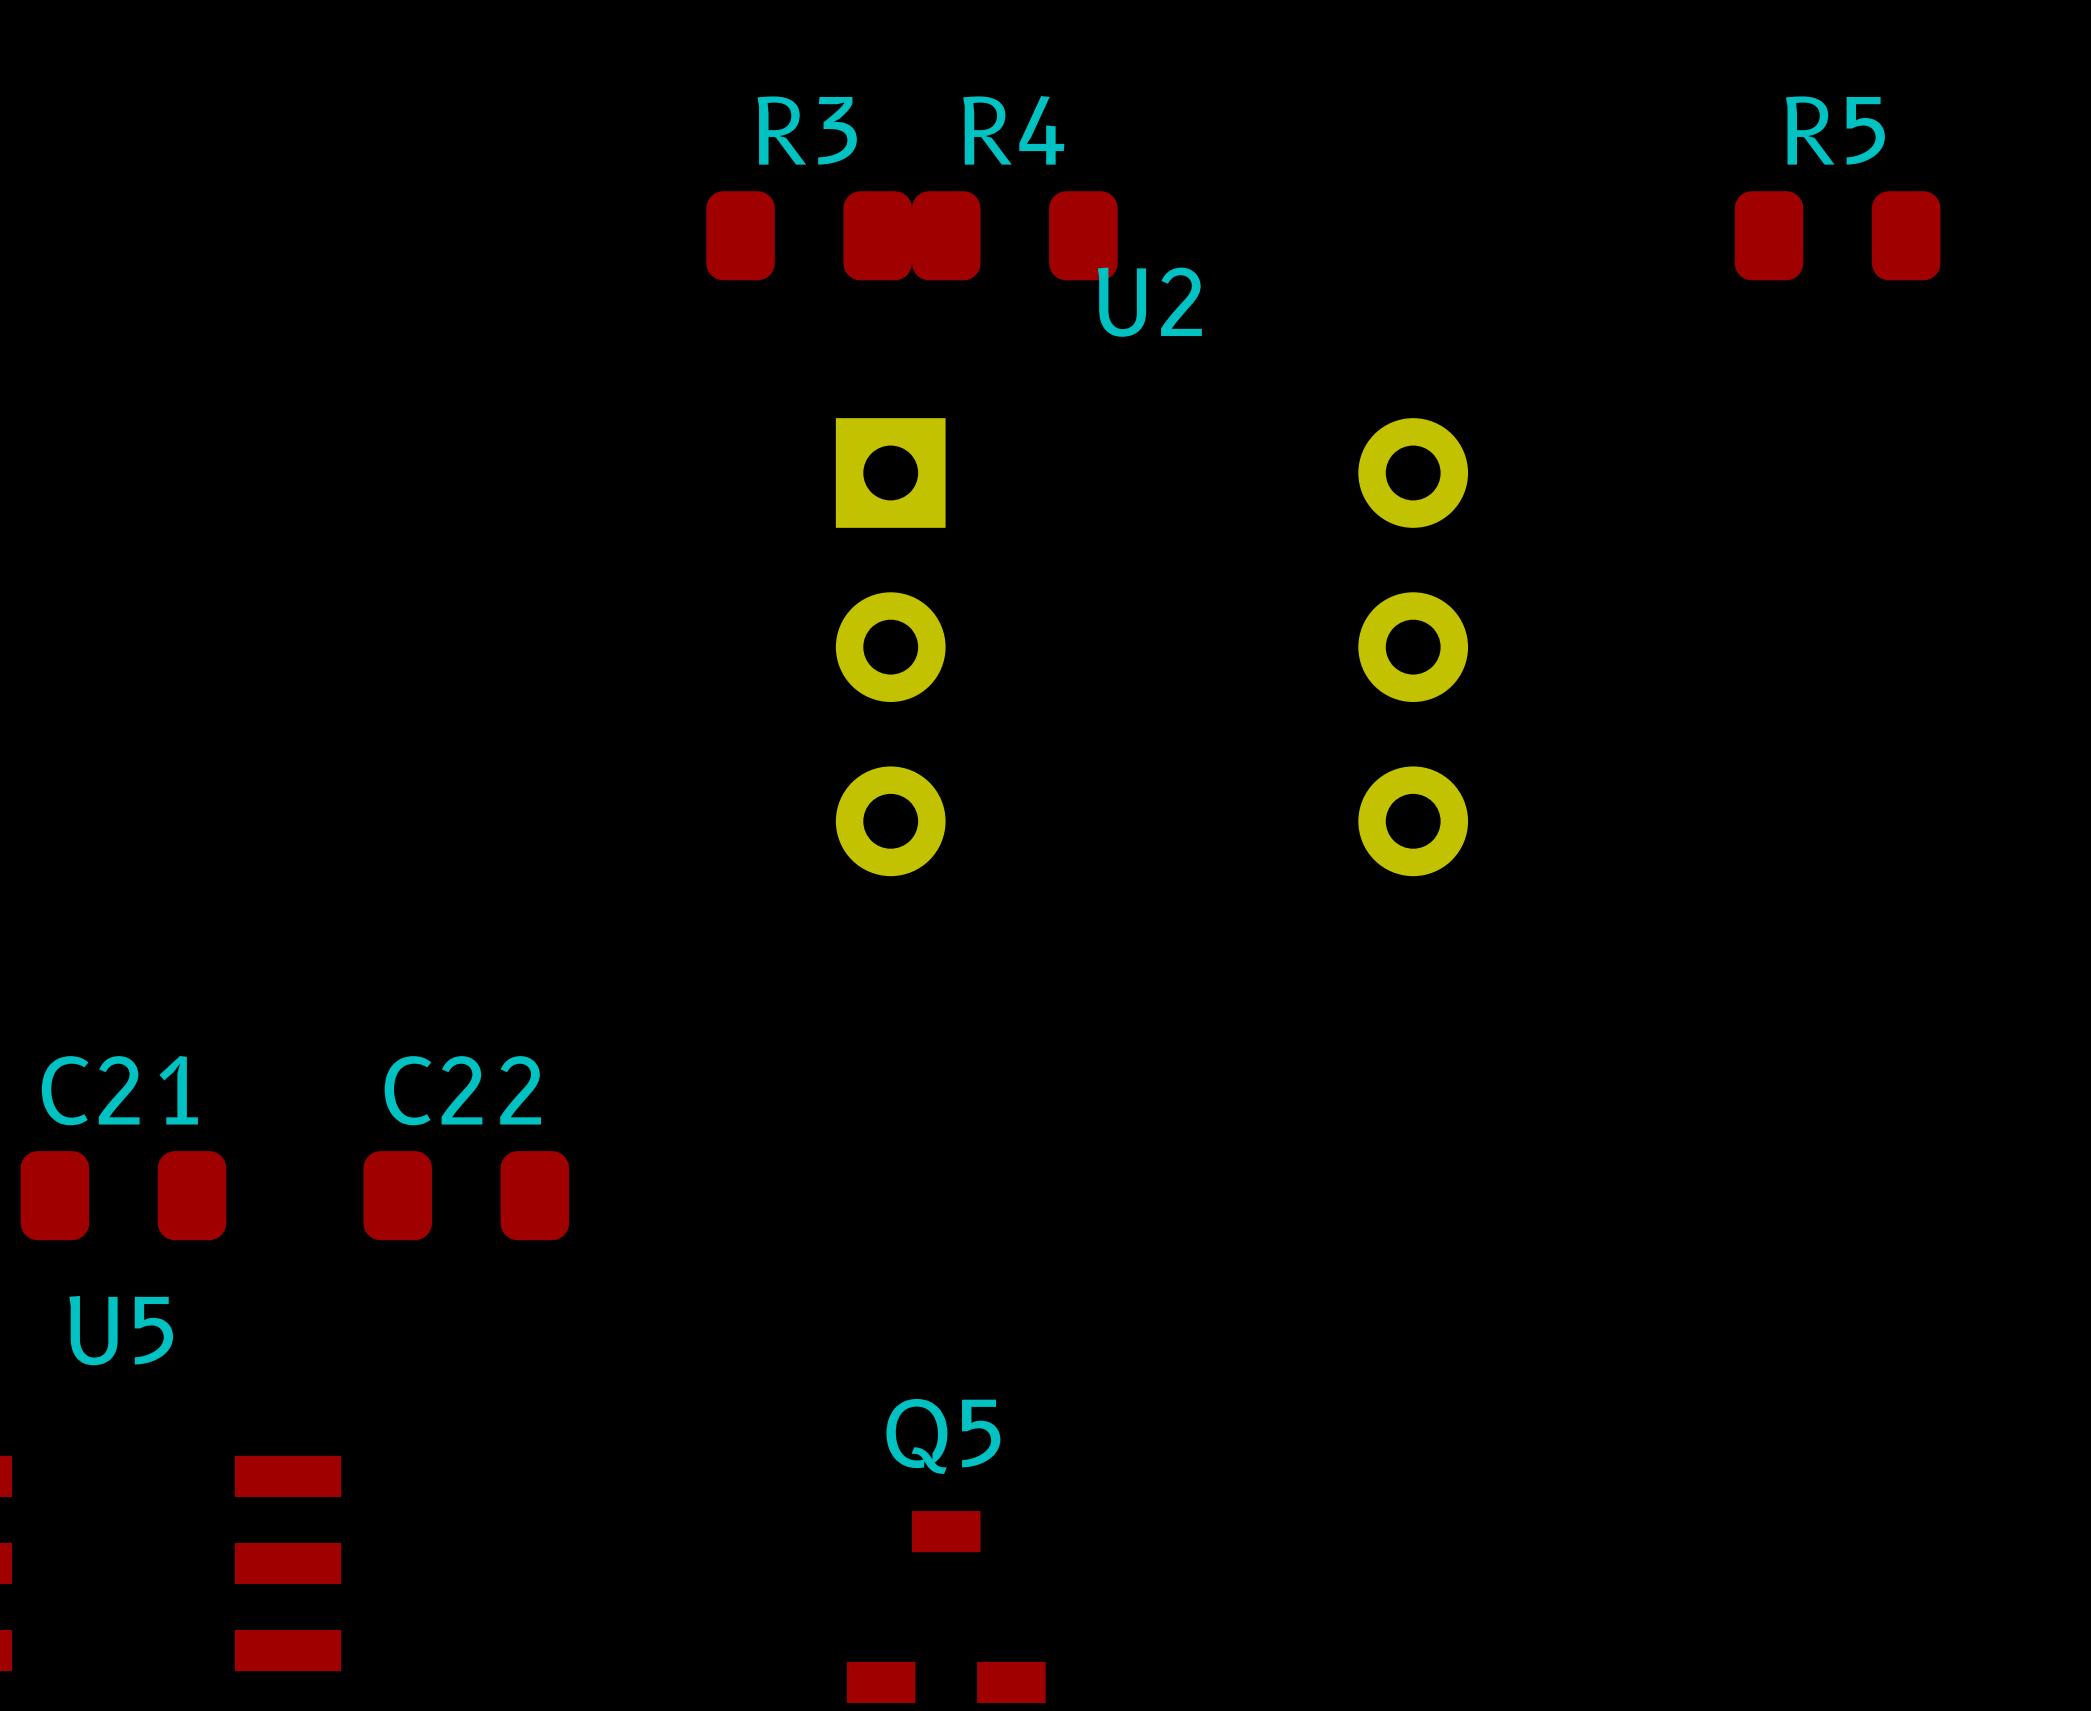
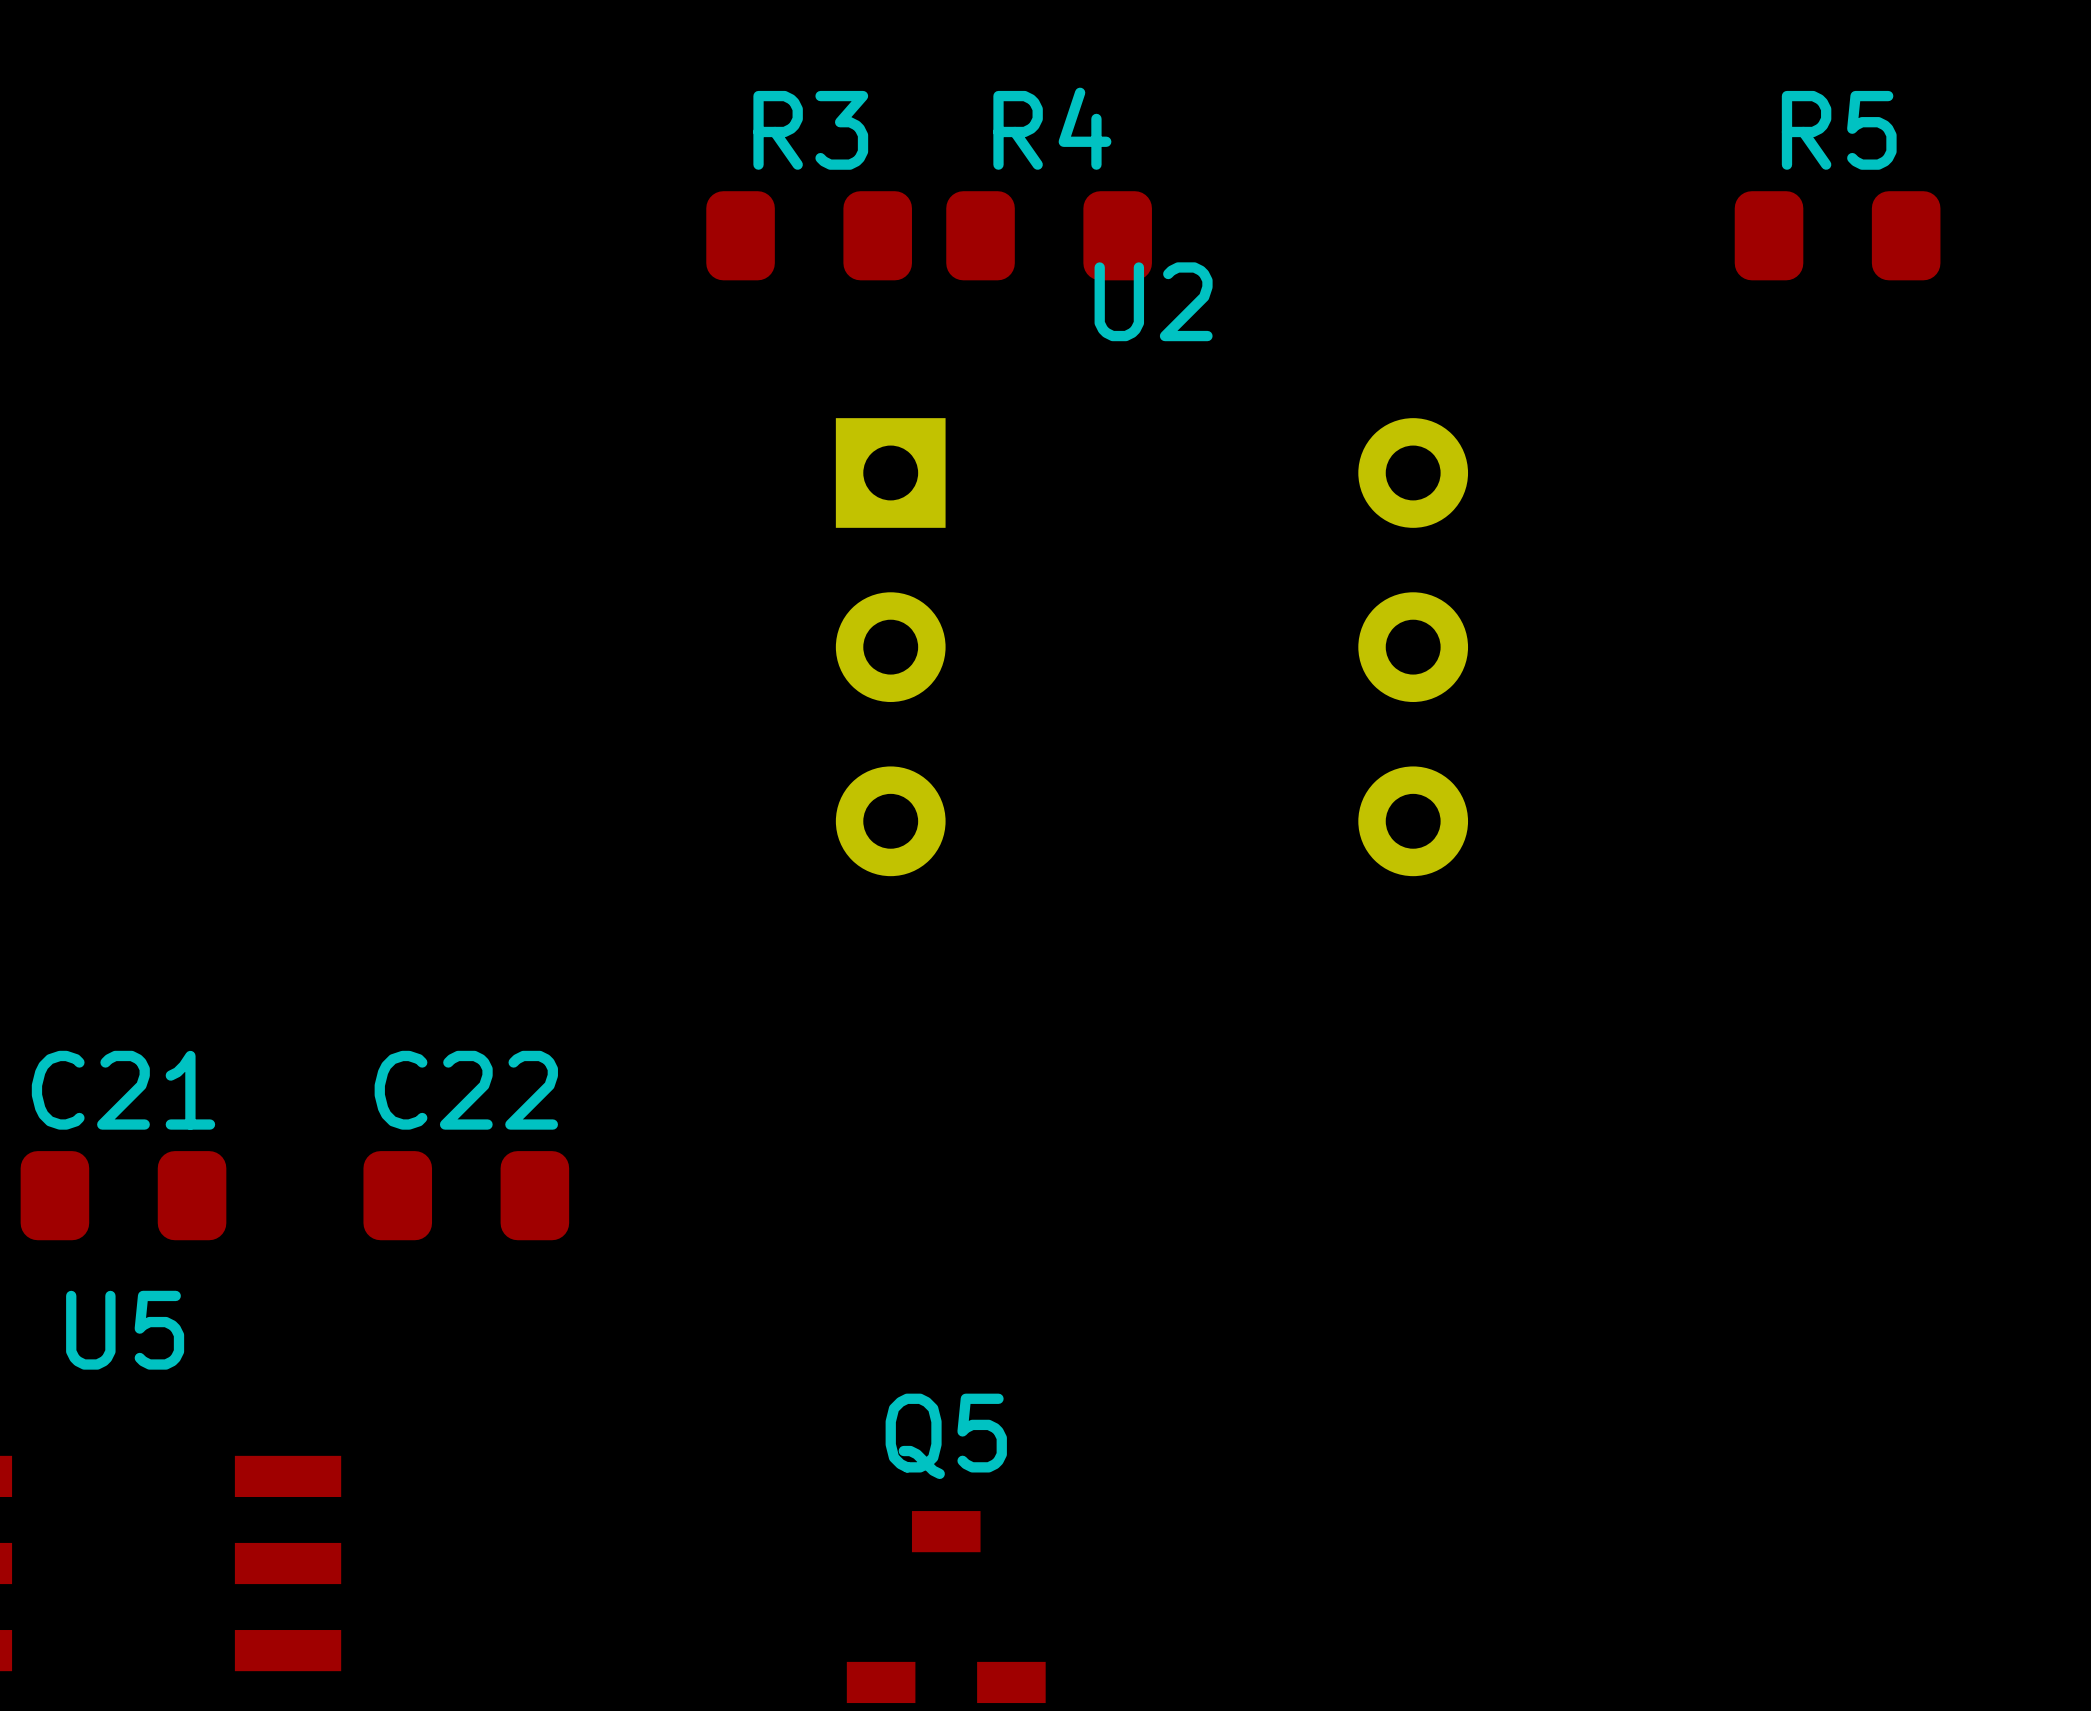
R4 position: (1014, 235) -> (1049, 235)

